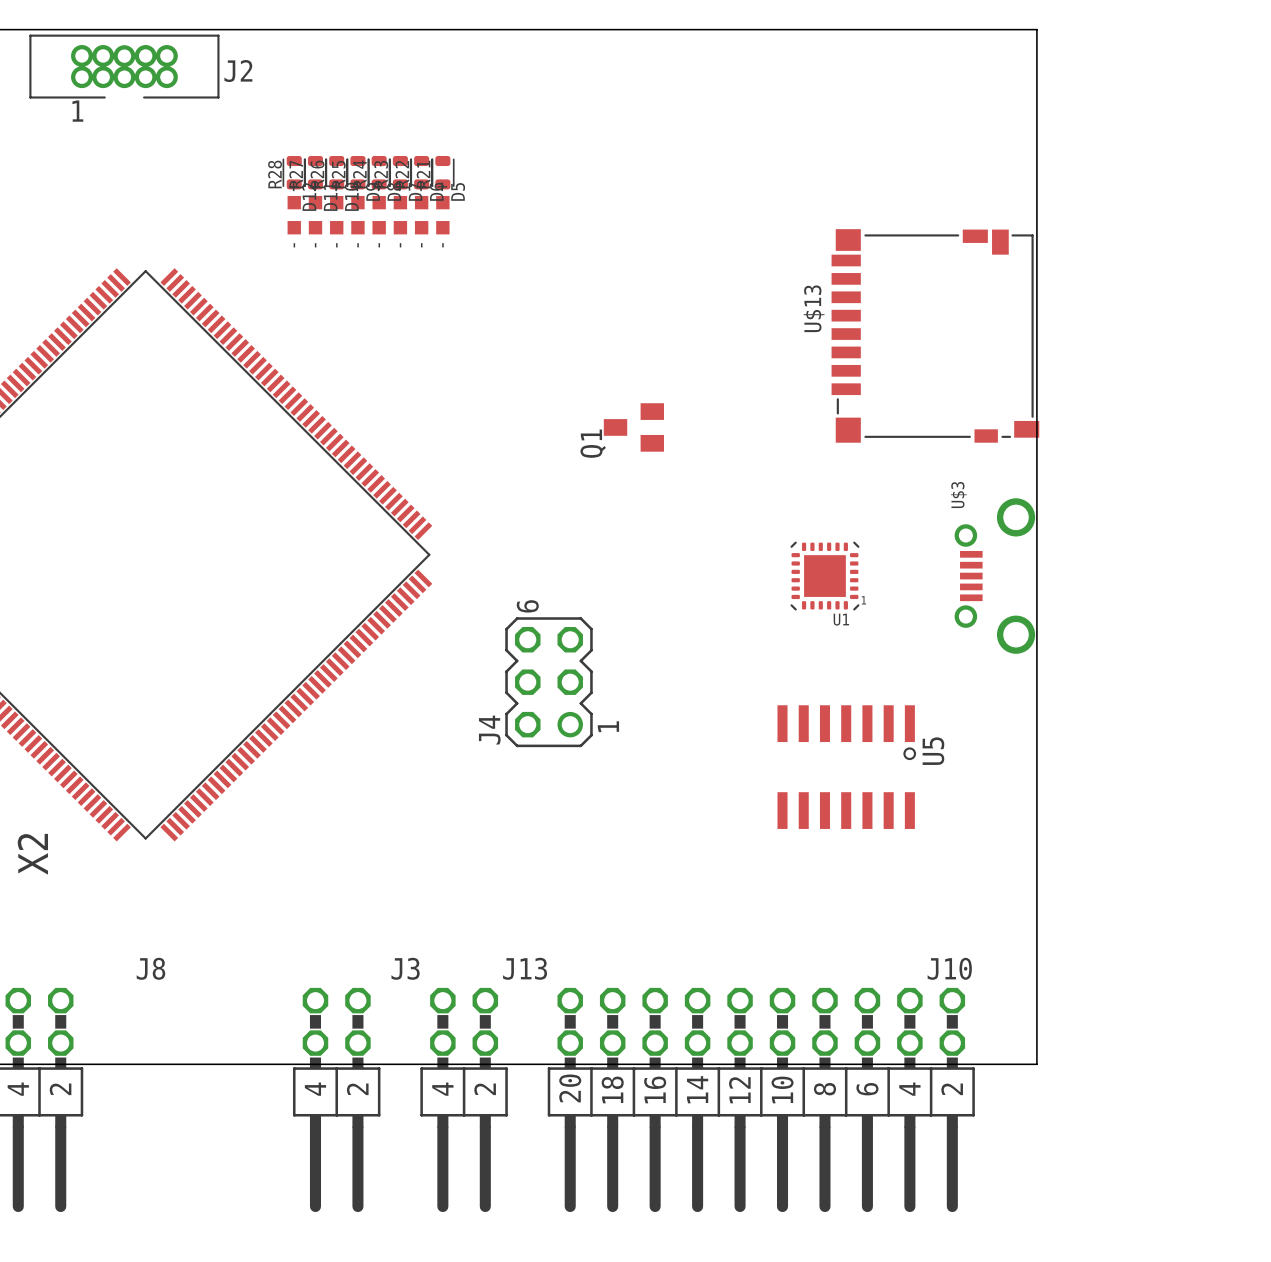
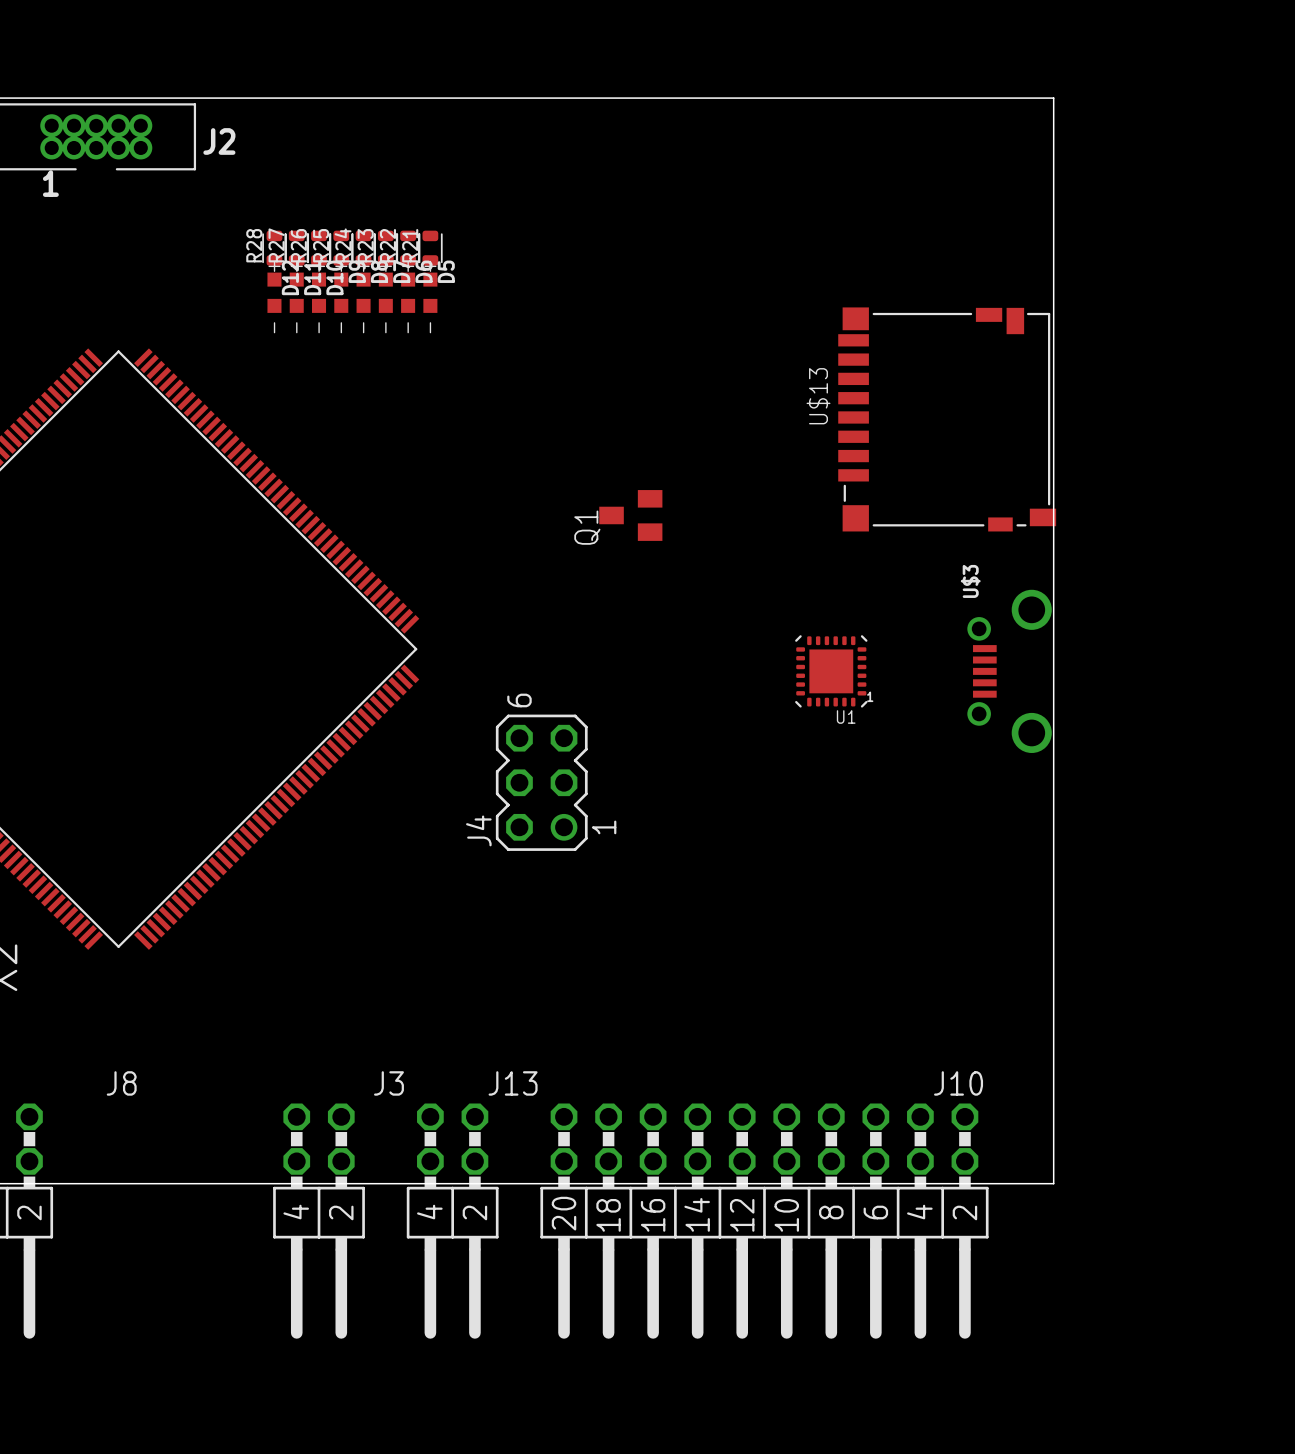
U5: (846, 767) -> none

